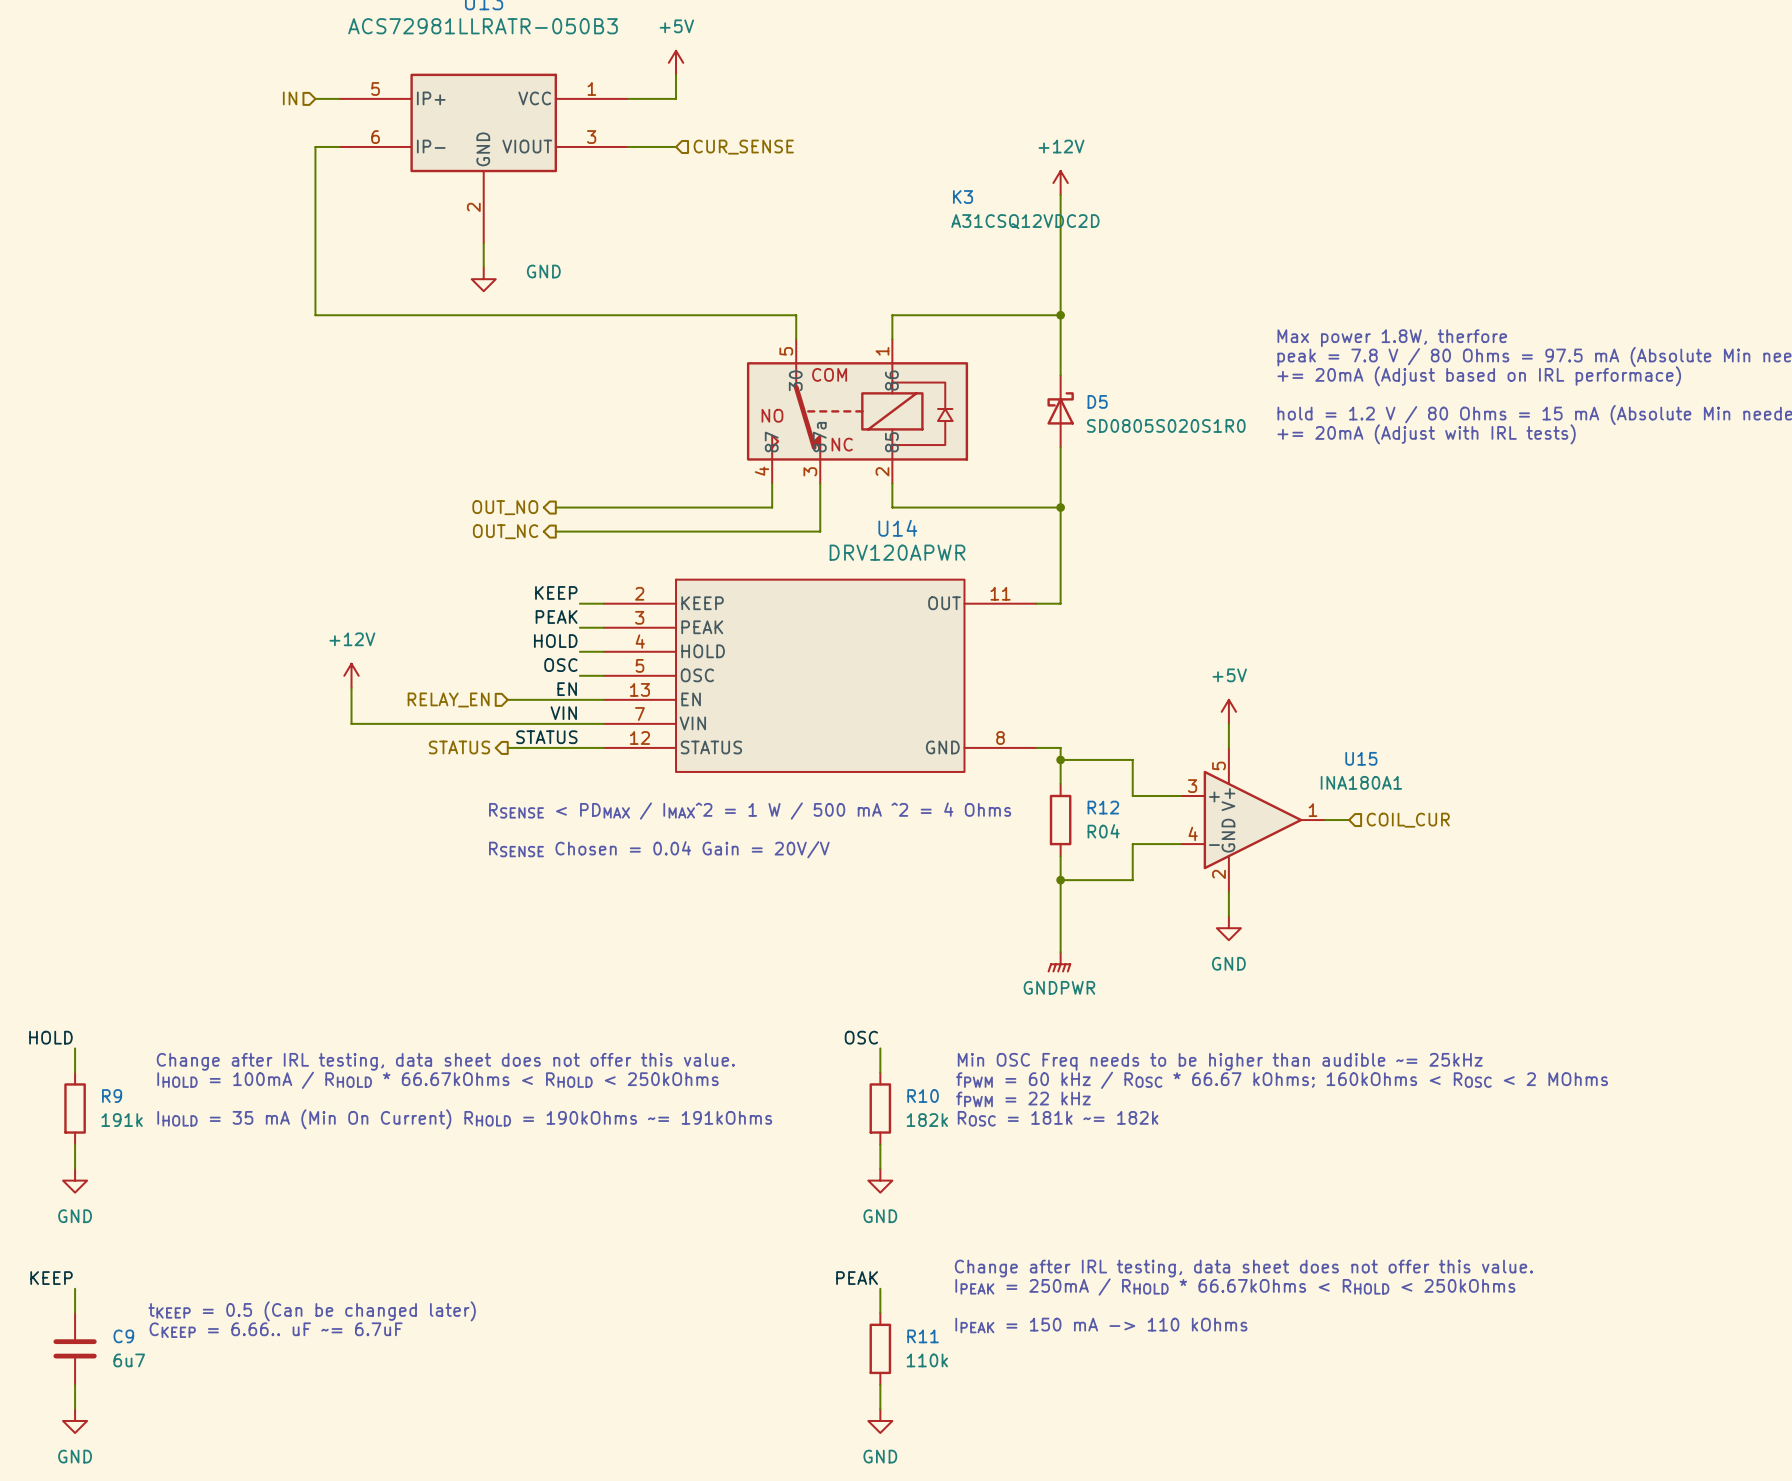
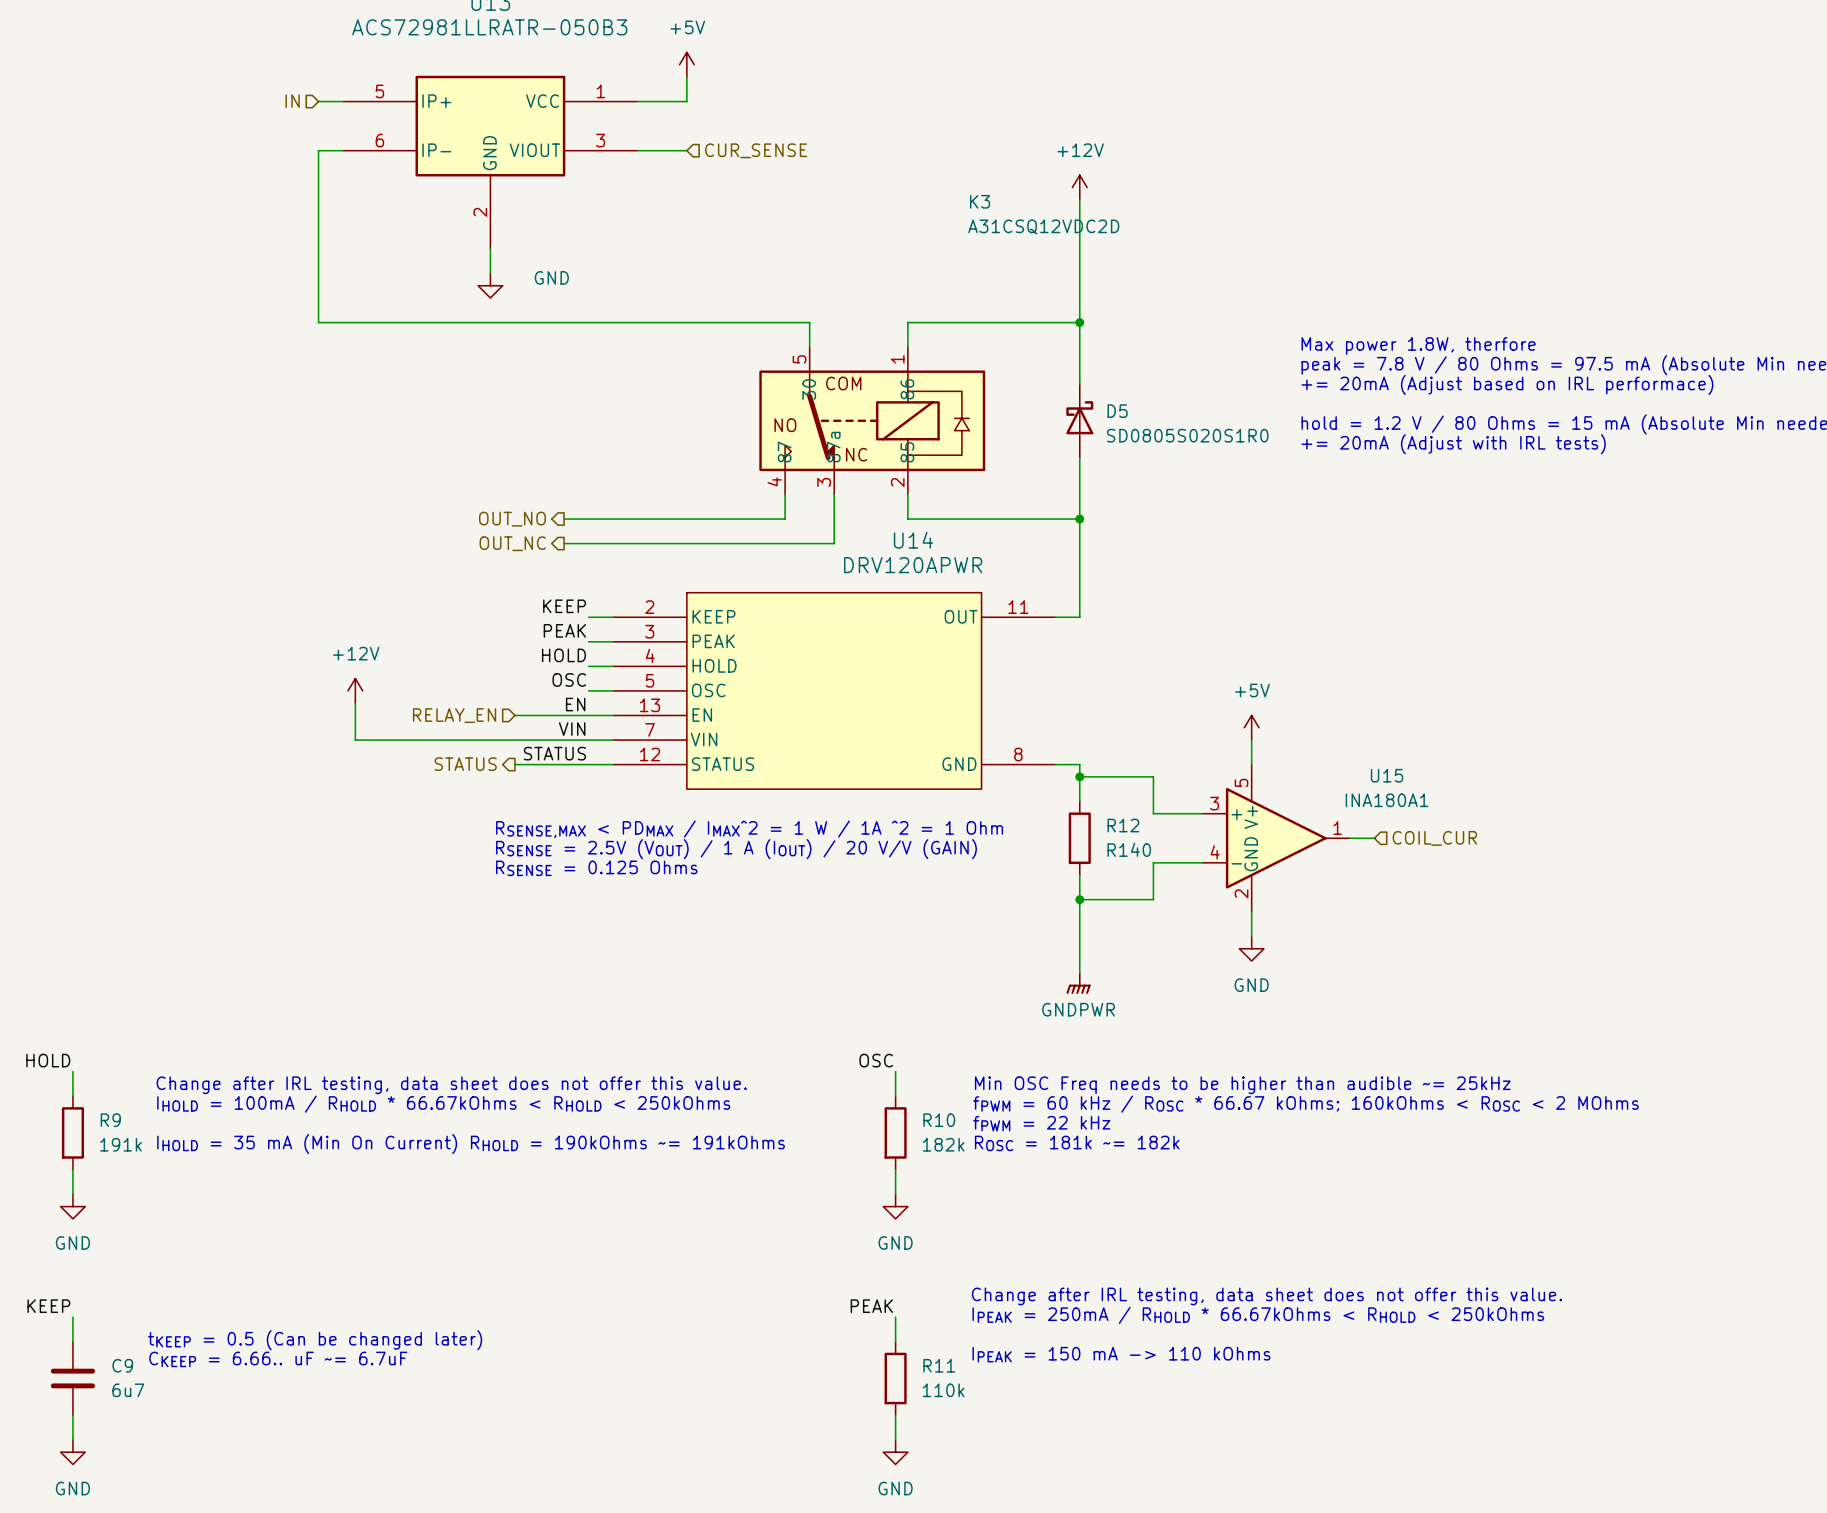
text: RSENSE < PDMAX / IMAX^2 = 1 W / 500 mA ^2 = 4 Ohms (750, 811) -> RSENSE,MAX < PDMAX / IMAX^2 = 1 W / 1A ^2 = 1 Ohm (749, 829)
text: none -> RSENSE = 2.5V (VOUT) / 1 A (IOUT) / 20 V/V (GAIN) (736, 849)
R12 value: R04 (1103, 831) -> R140 (1129, 849)
text: RSENSE Chosen = 0.04 Gain = 20V/V (659, 849) -> RSENSE = 0.125 Ohms (596, 868)

